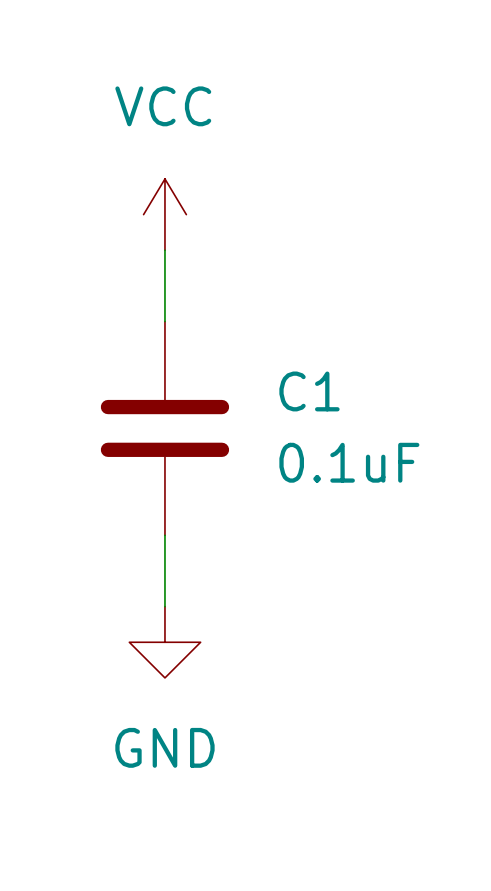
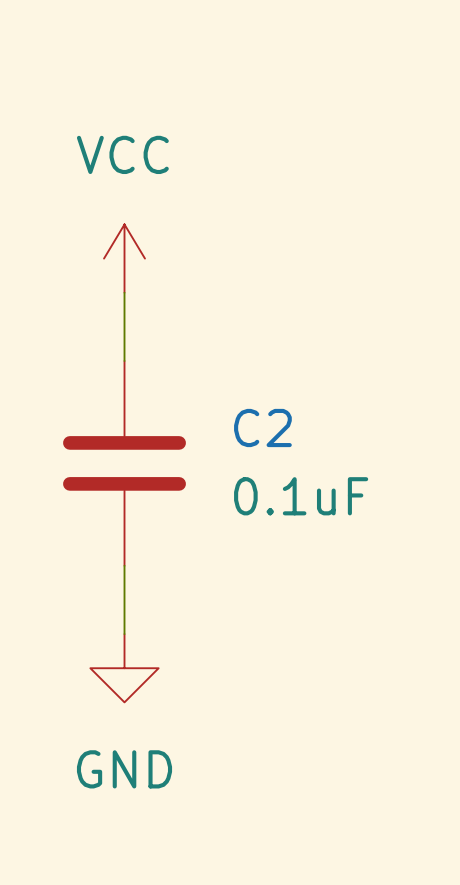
C1 name: C1 (309, 391) -> C2 (262, 427)

